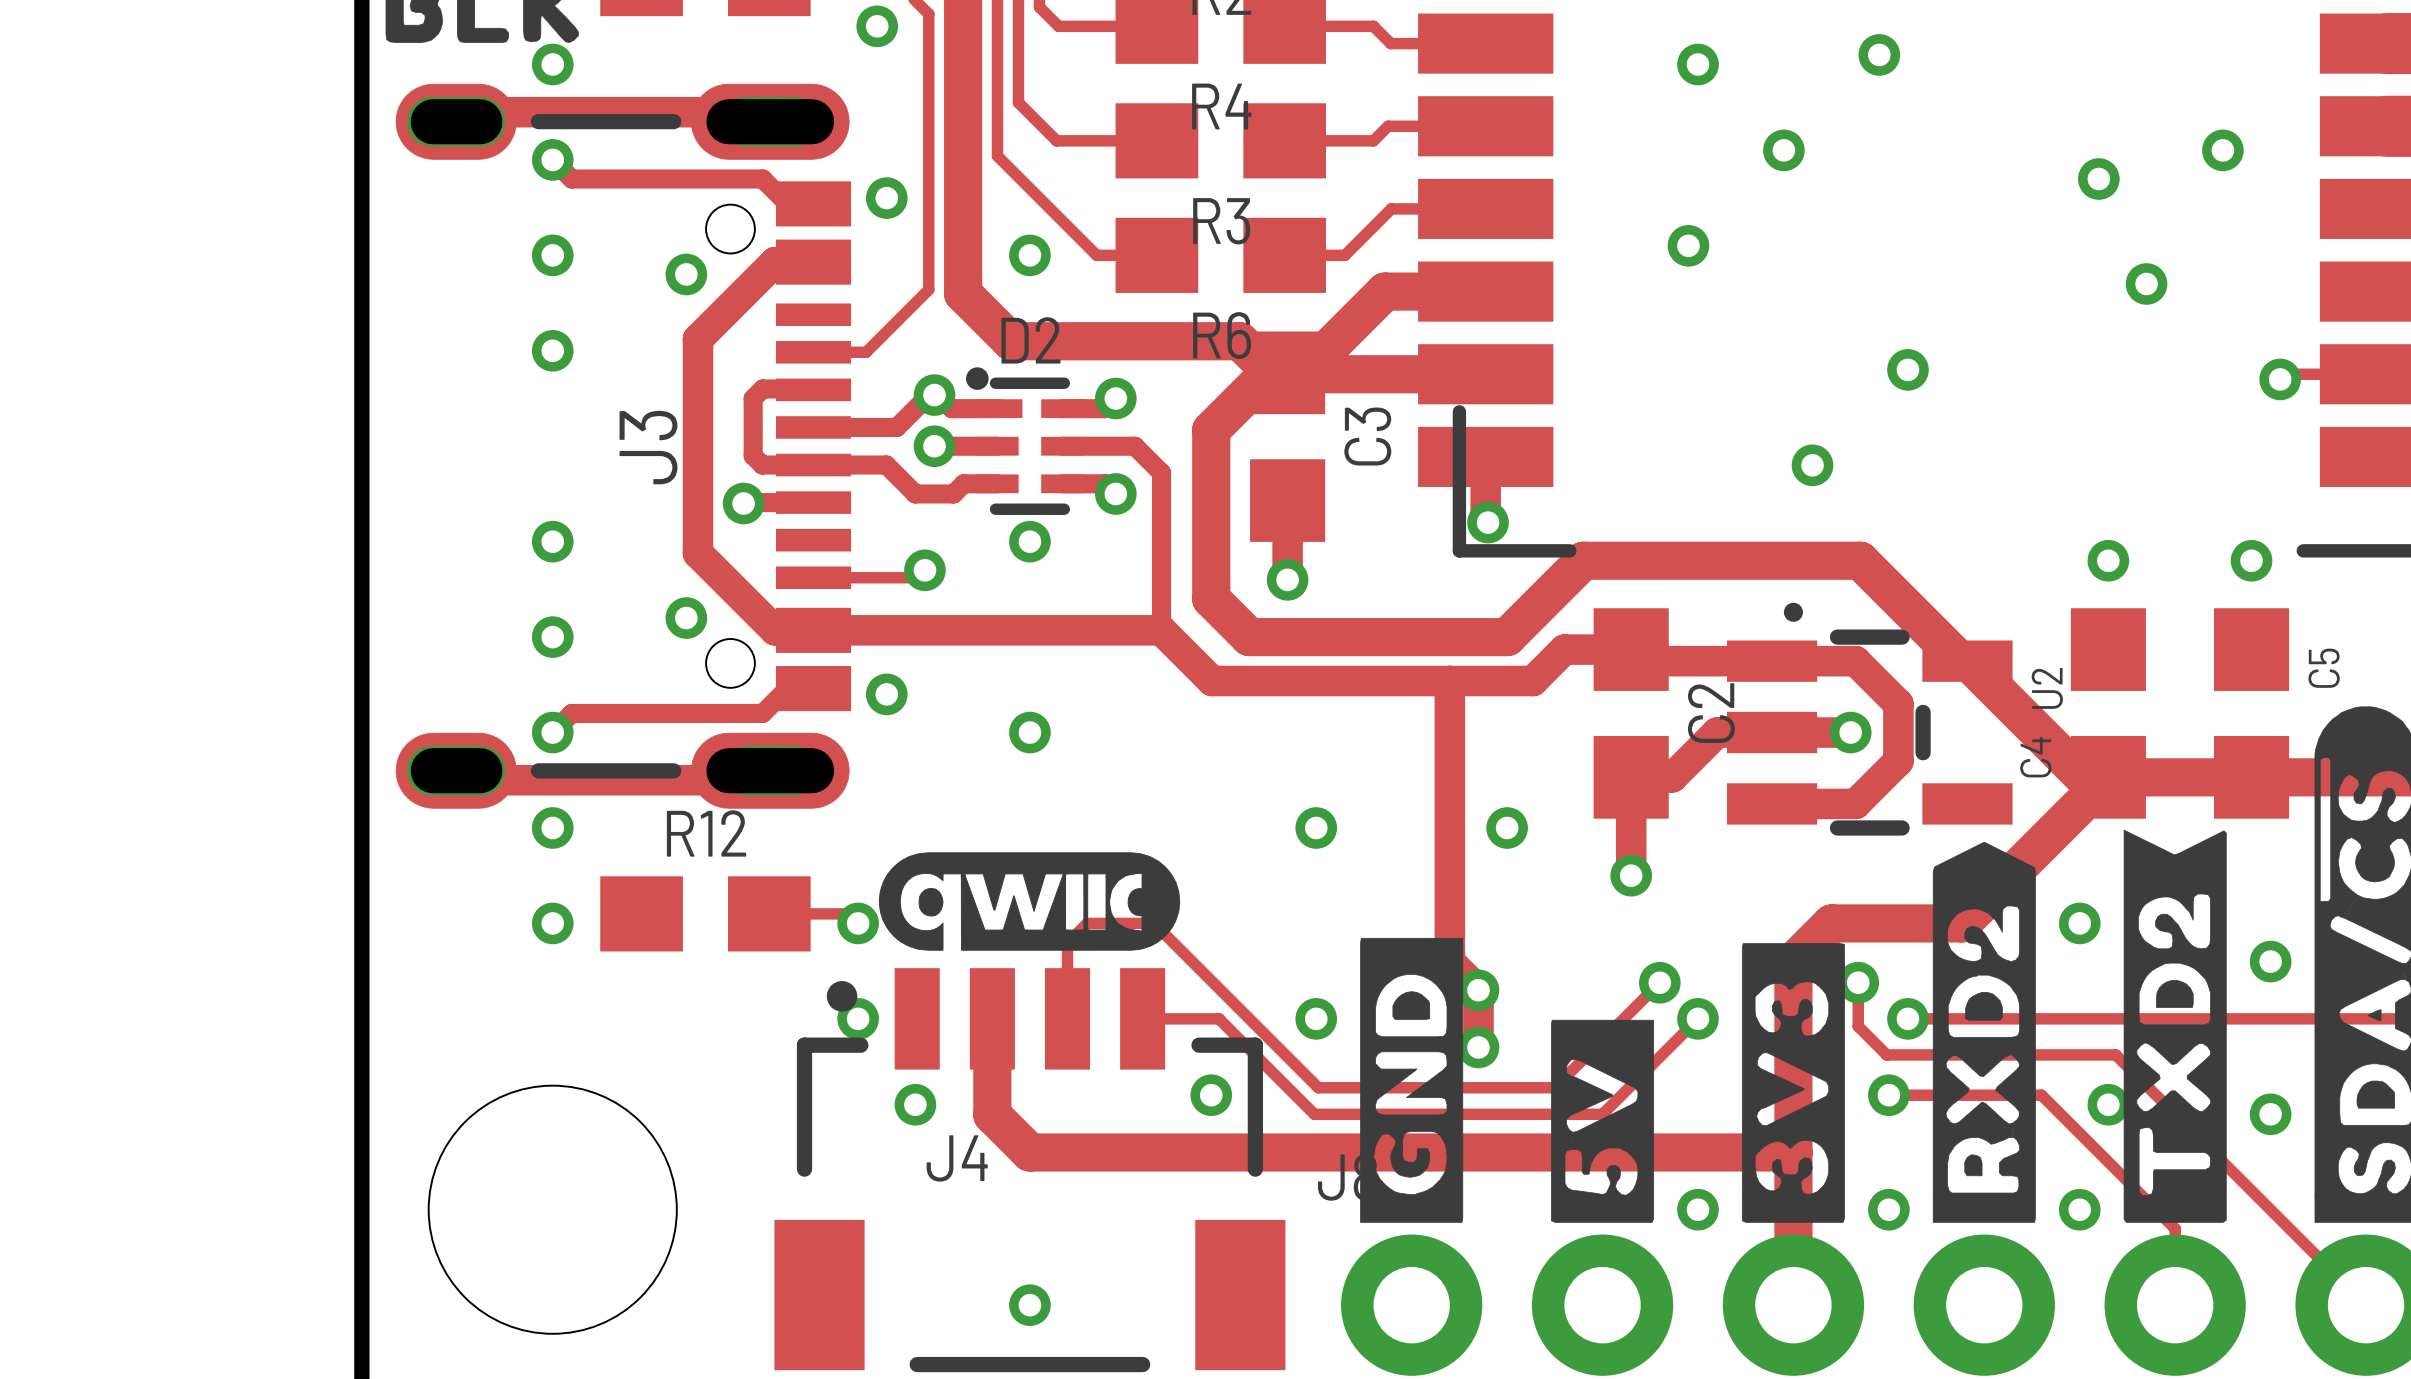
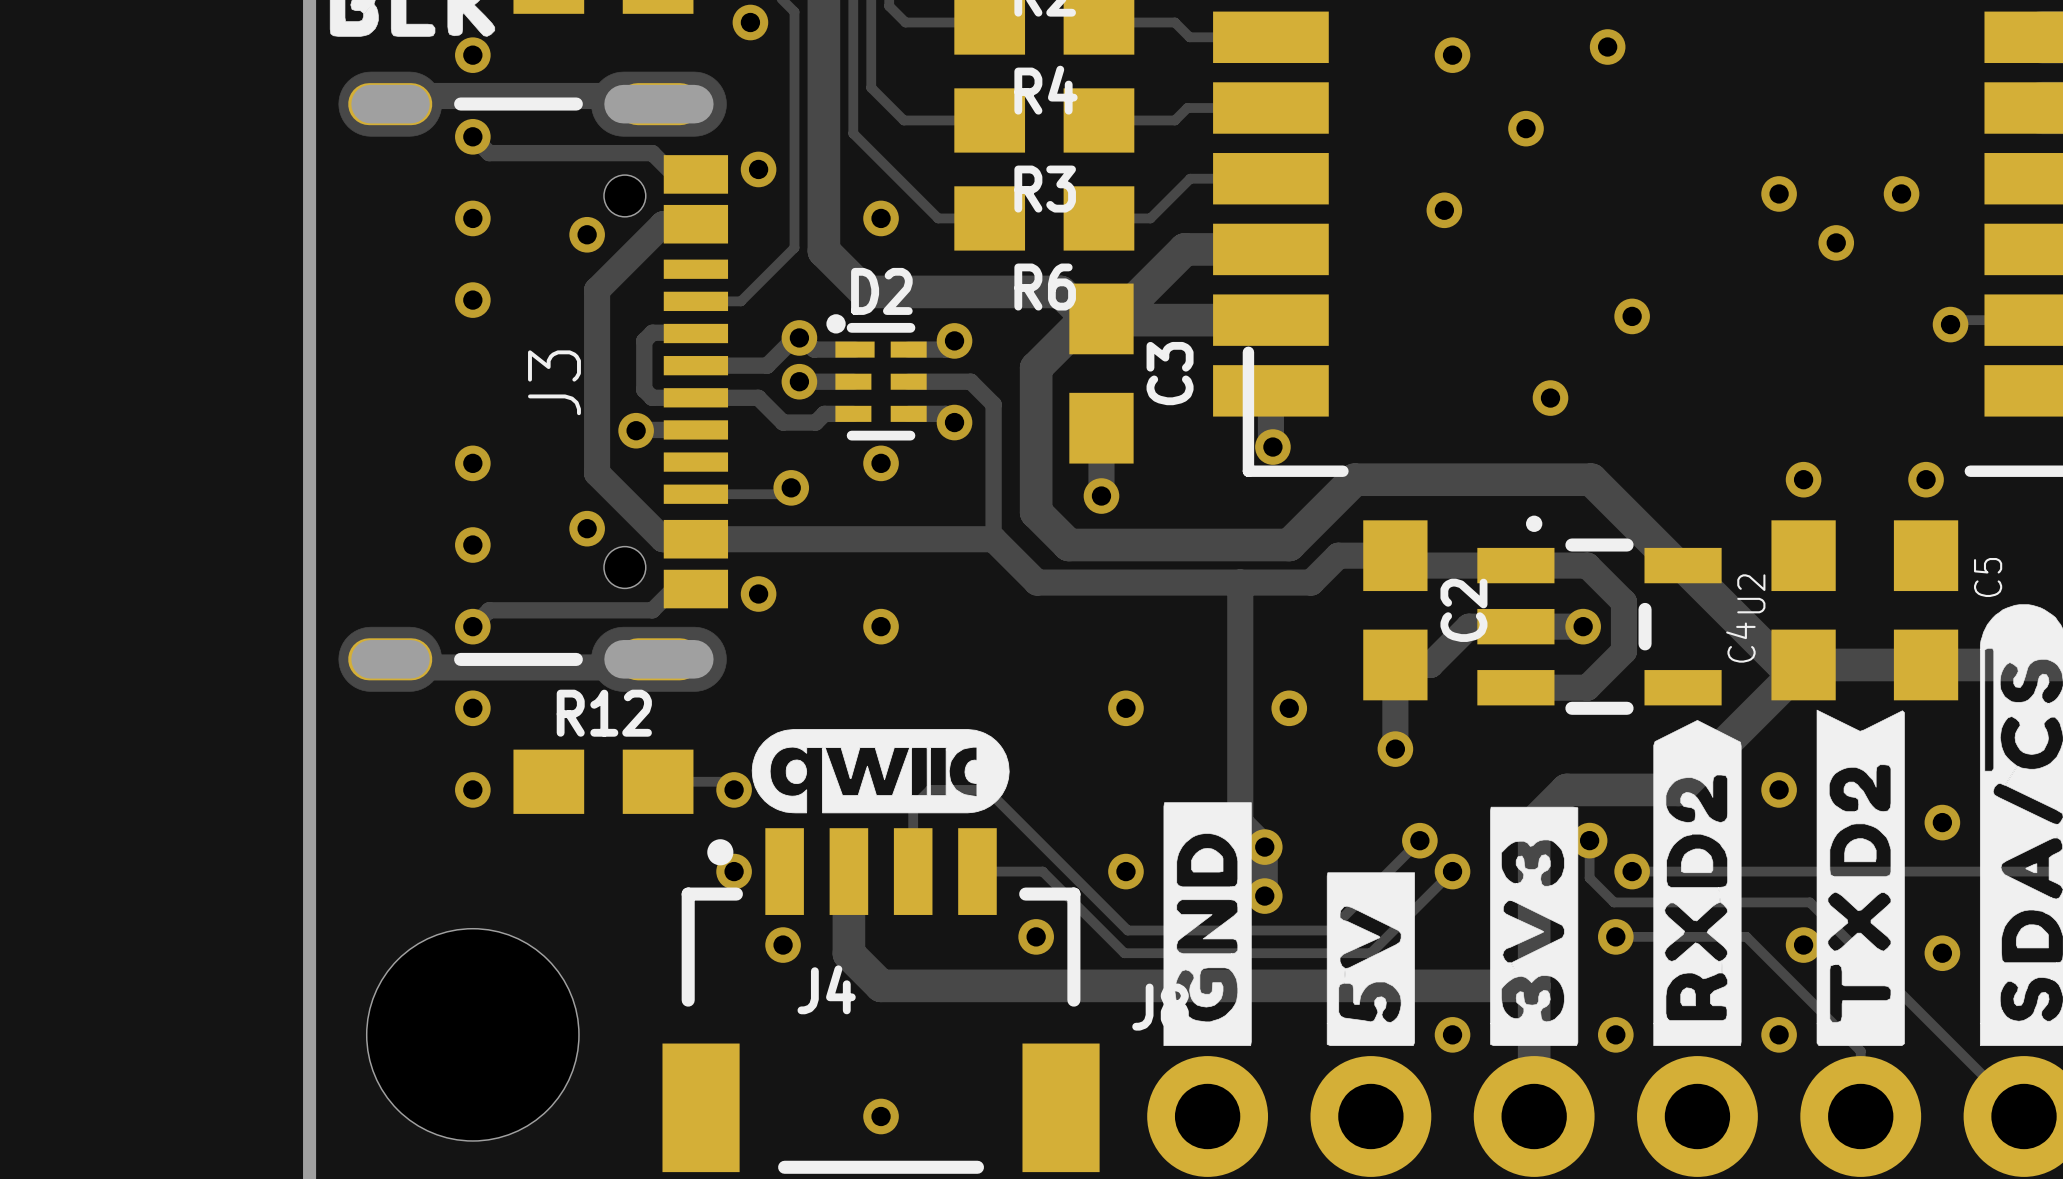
via: (2222, 150) -> none
via position: (2098, 179) -> (1779, 193)
via: none -> (1901, 193)

